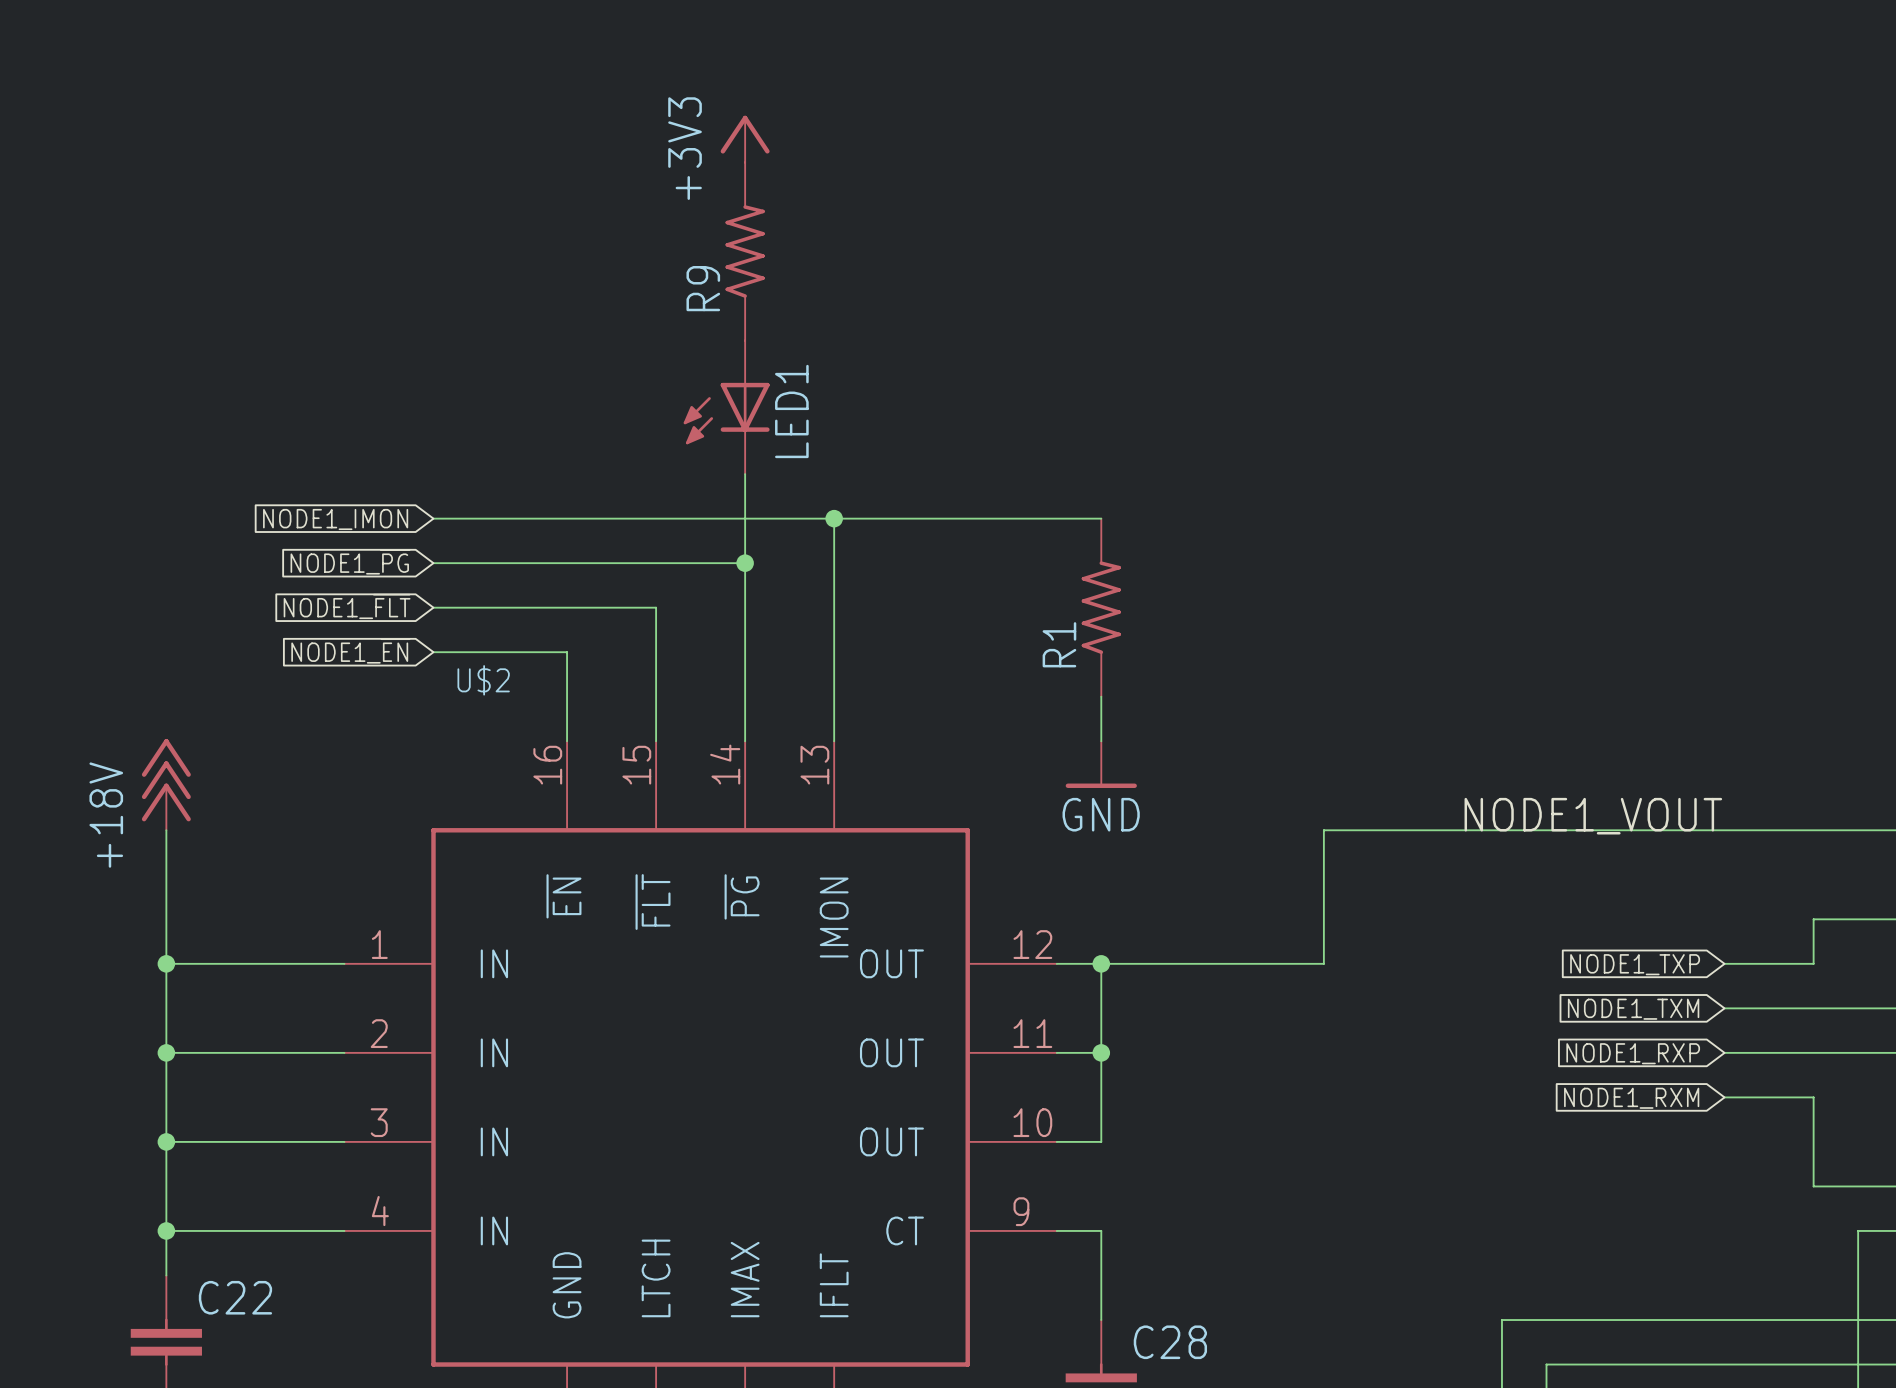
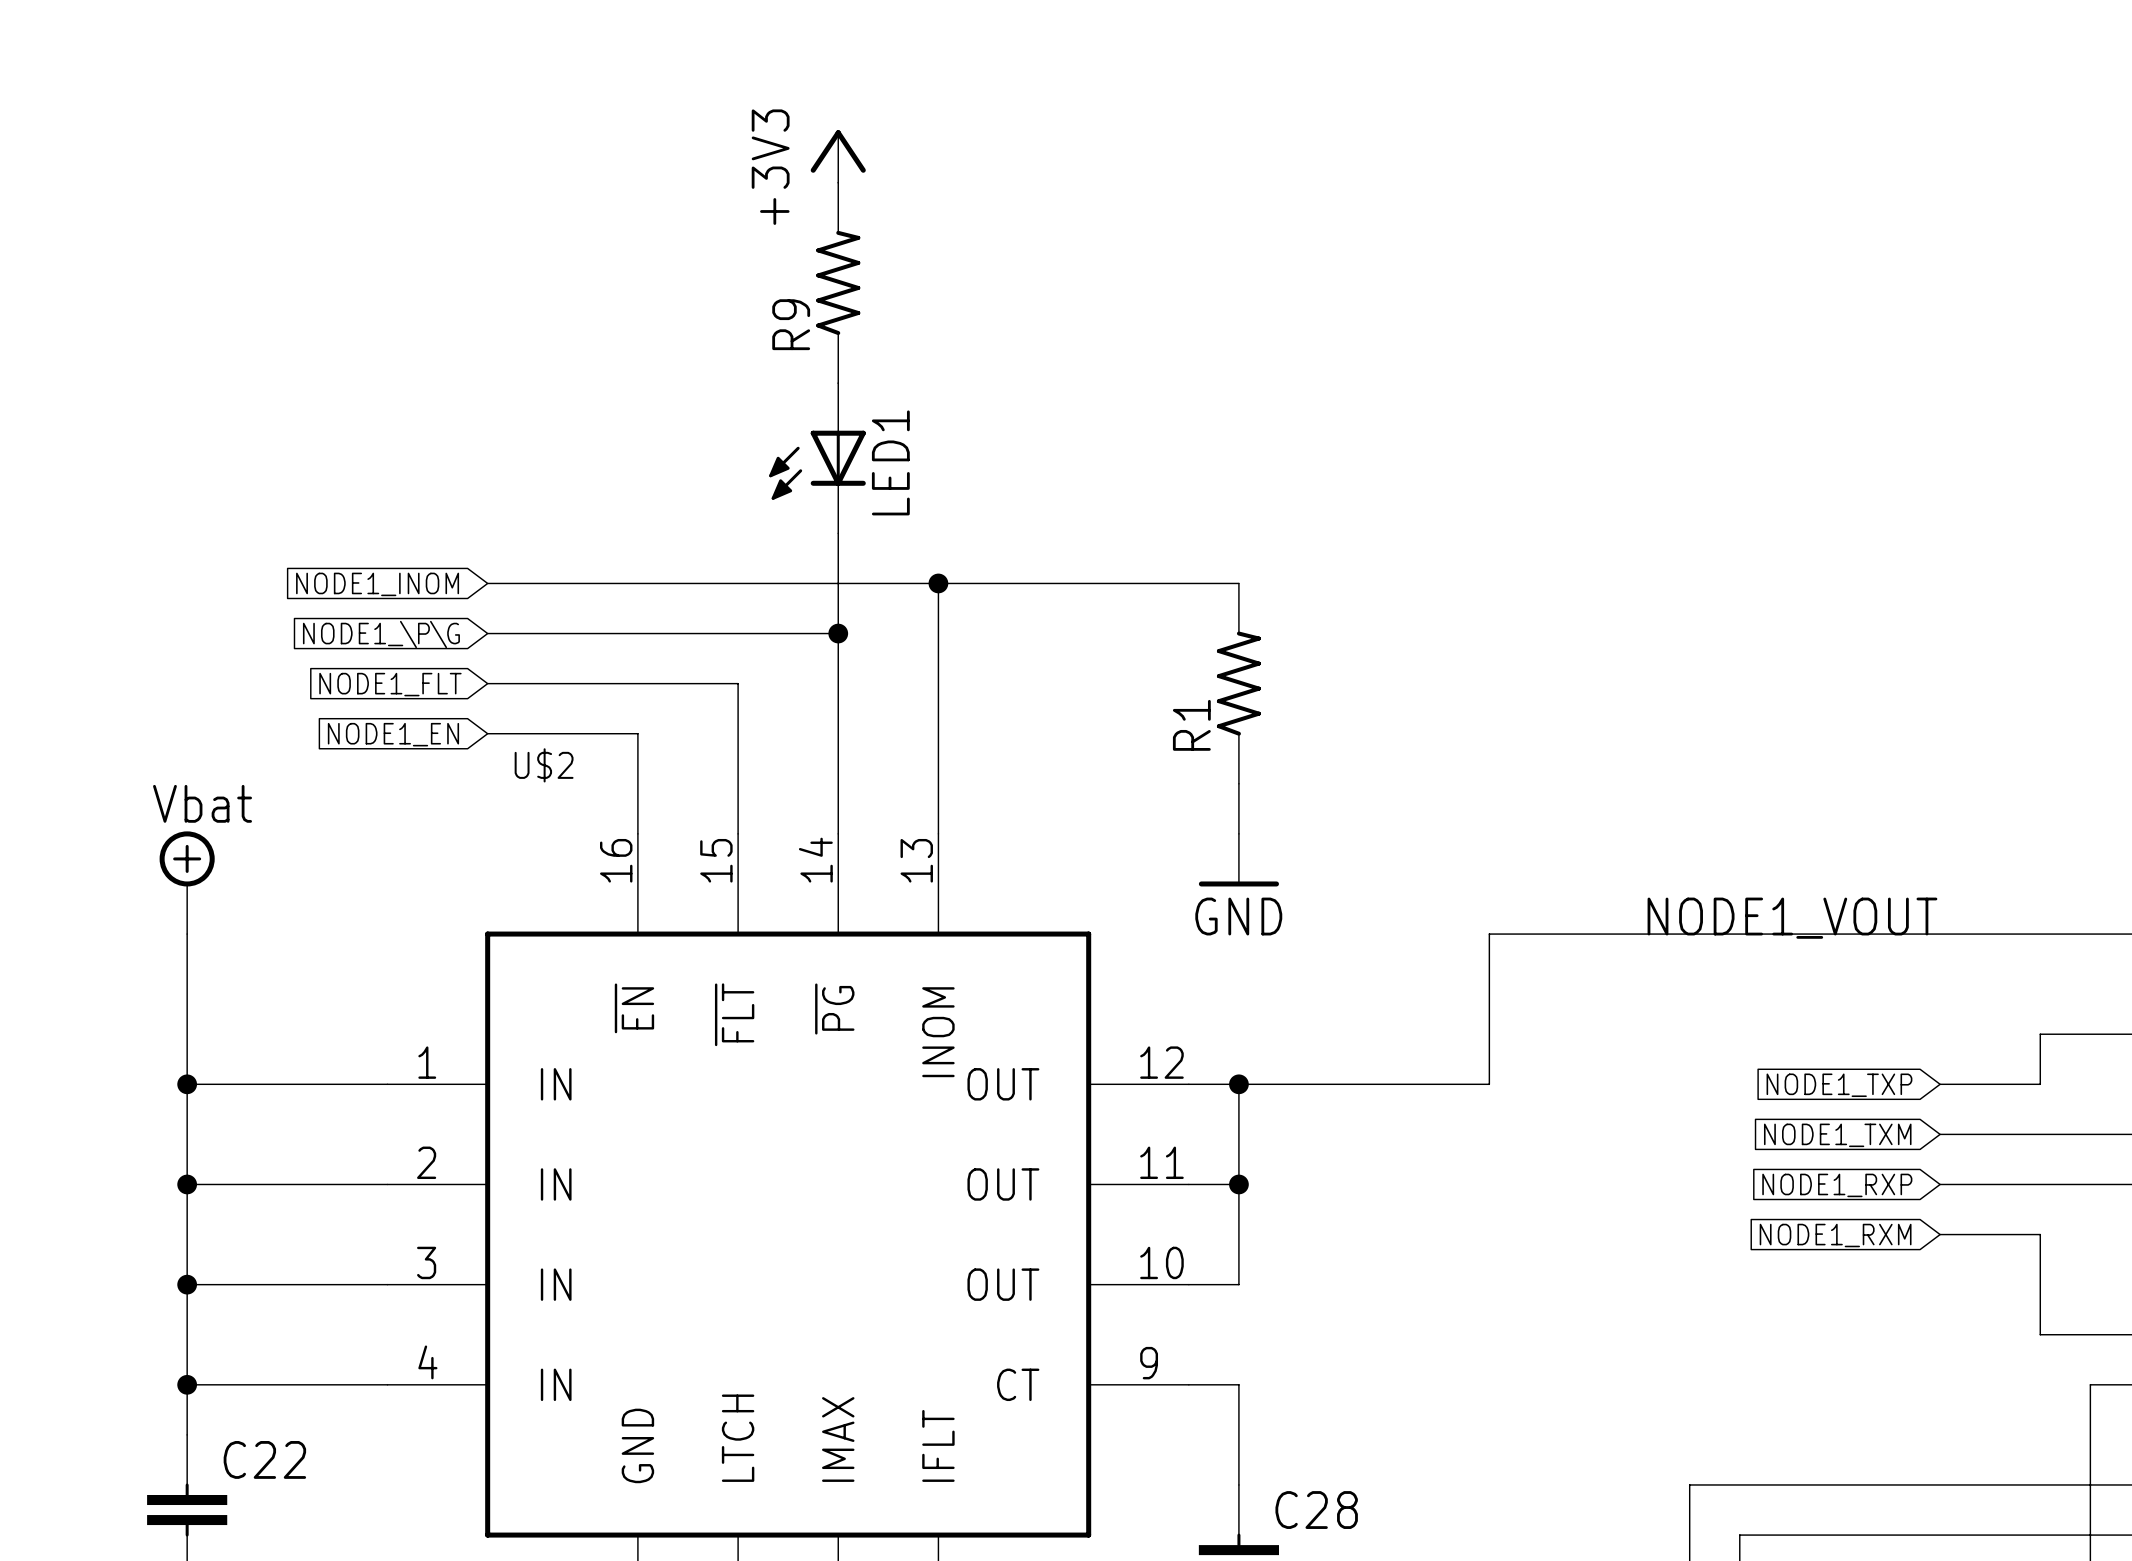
global label: NODE1_IMON (335, 519) -> NODE1_INOM (377, 584)
global label: NODE1_~{PG} (350, 561) -> NODE1_\P\G (381, 634)
global label: NODE1_~{FLT} (347, 606) -> NODE1_FLT (390, 684)
global label: NODE1_~{EN} (350, 651) -> NODE1_EN (393, 734)
power symbol: +18V (166, 784) -> Vbat (187, 882)
U$2 pin name: IMON (834, 917) -> INOM (938, 1032)

